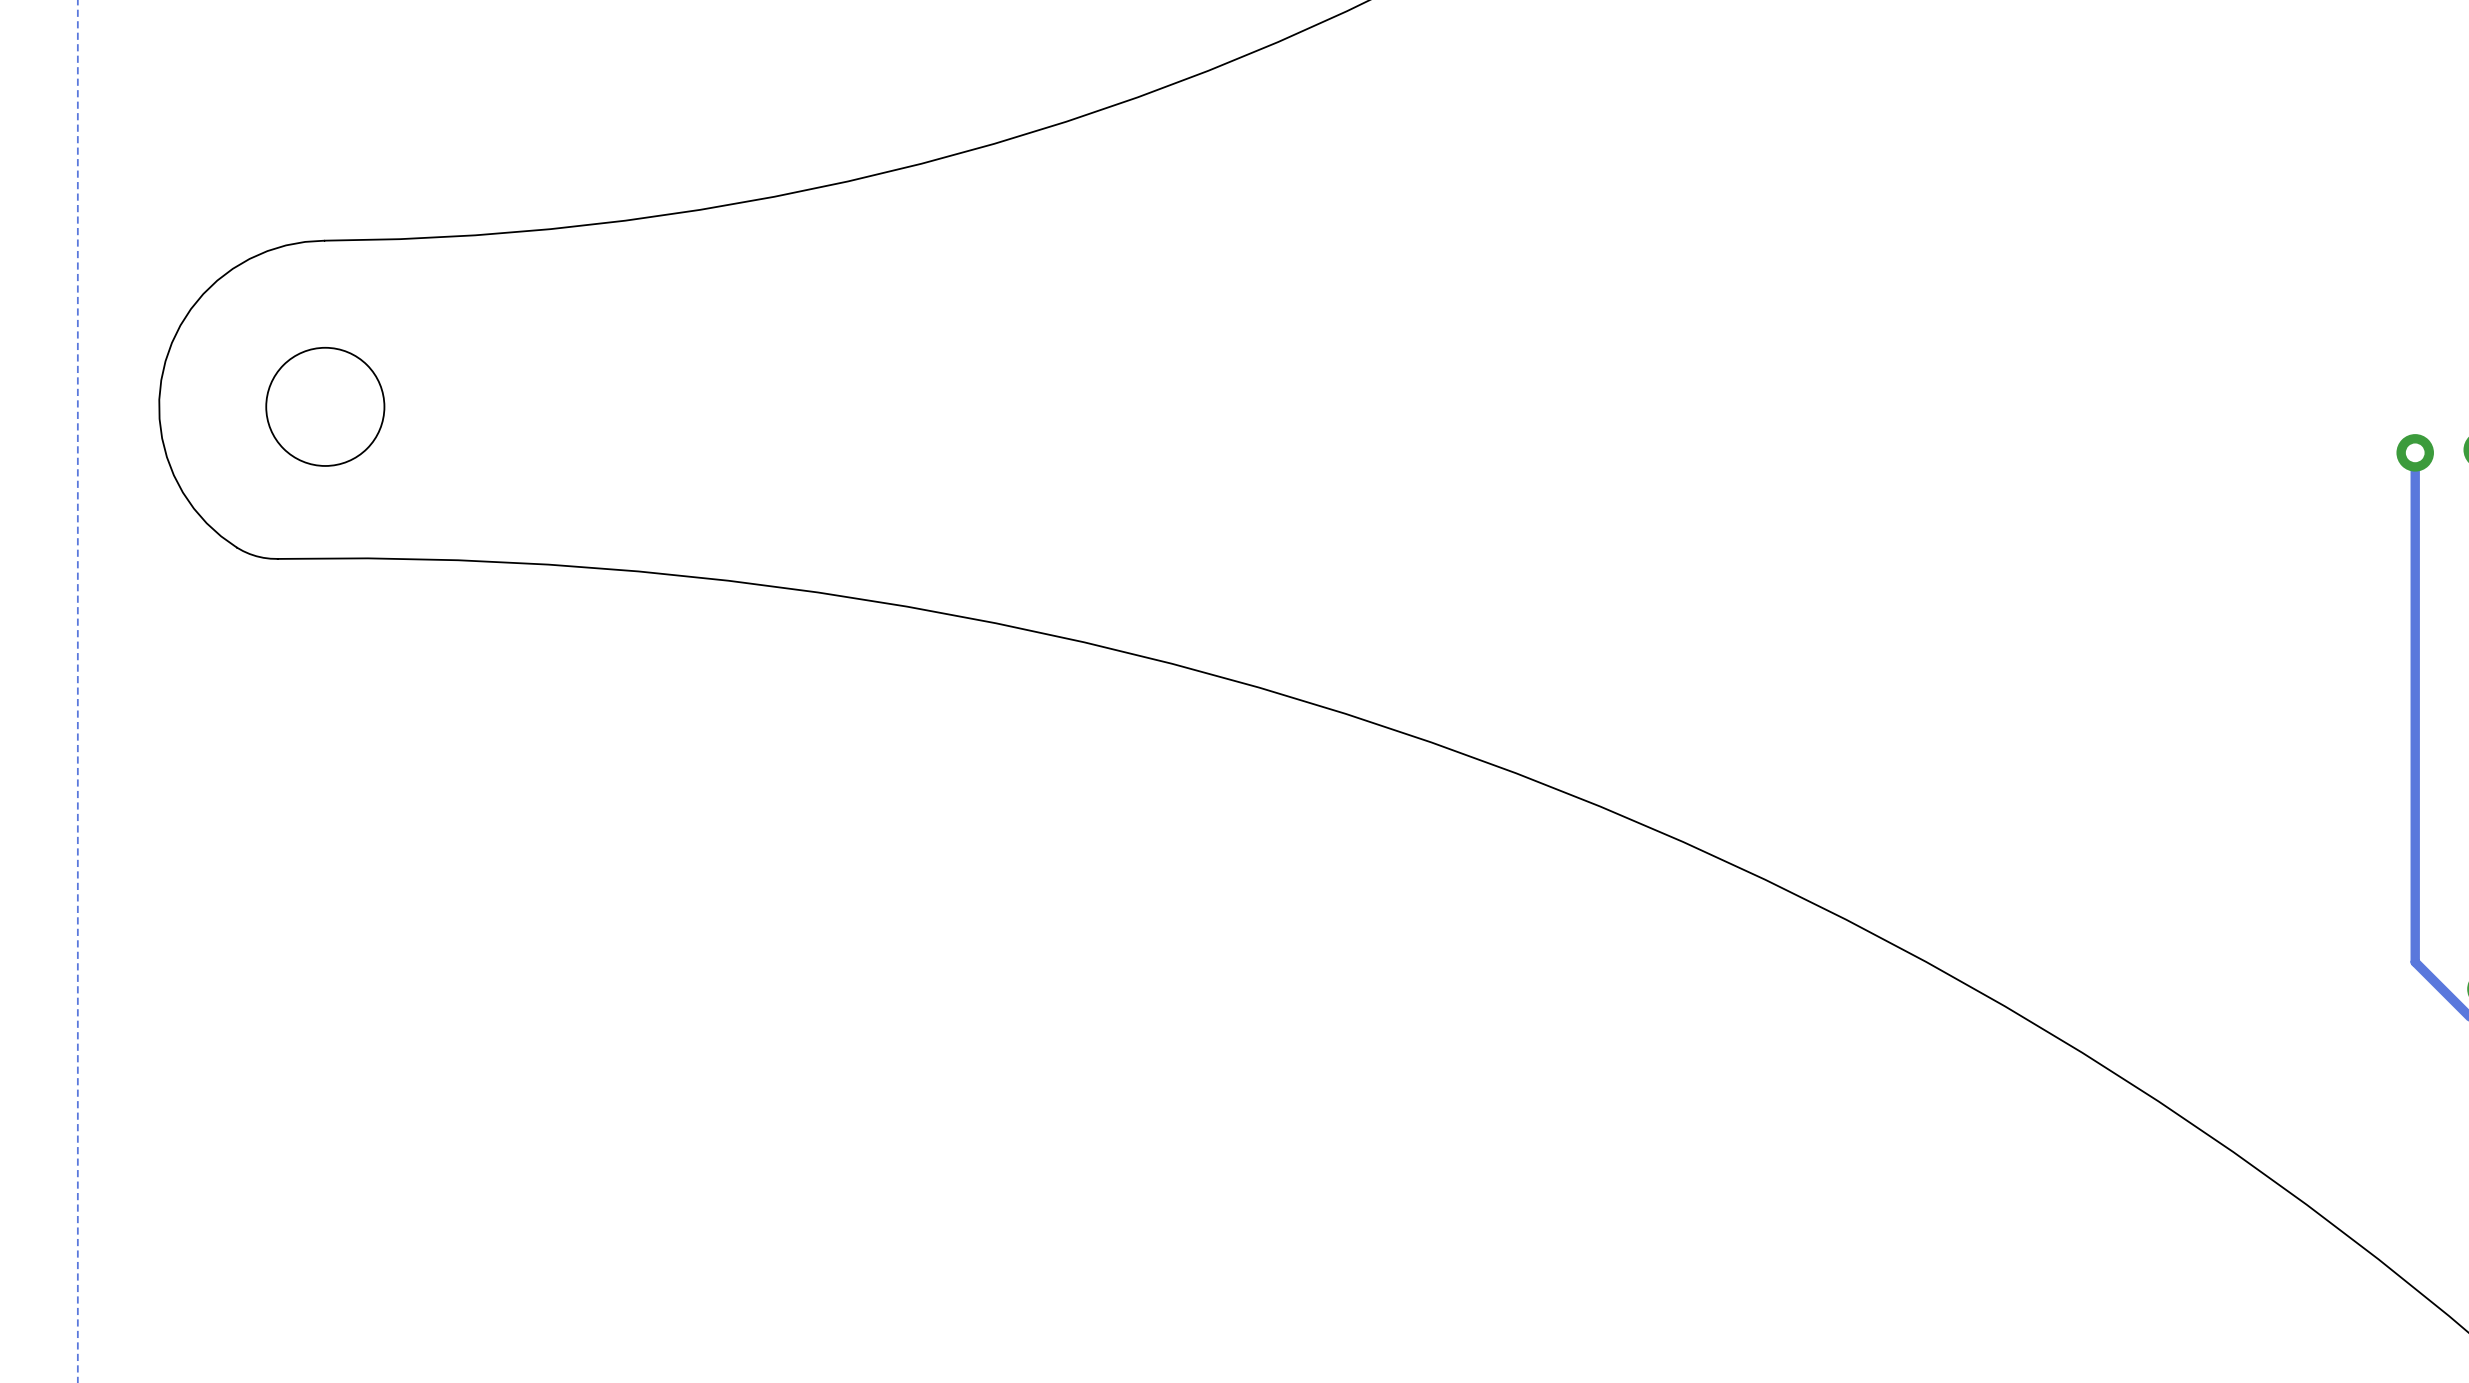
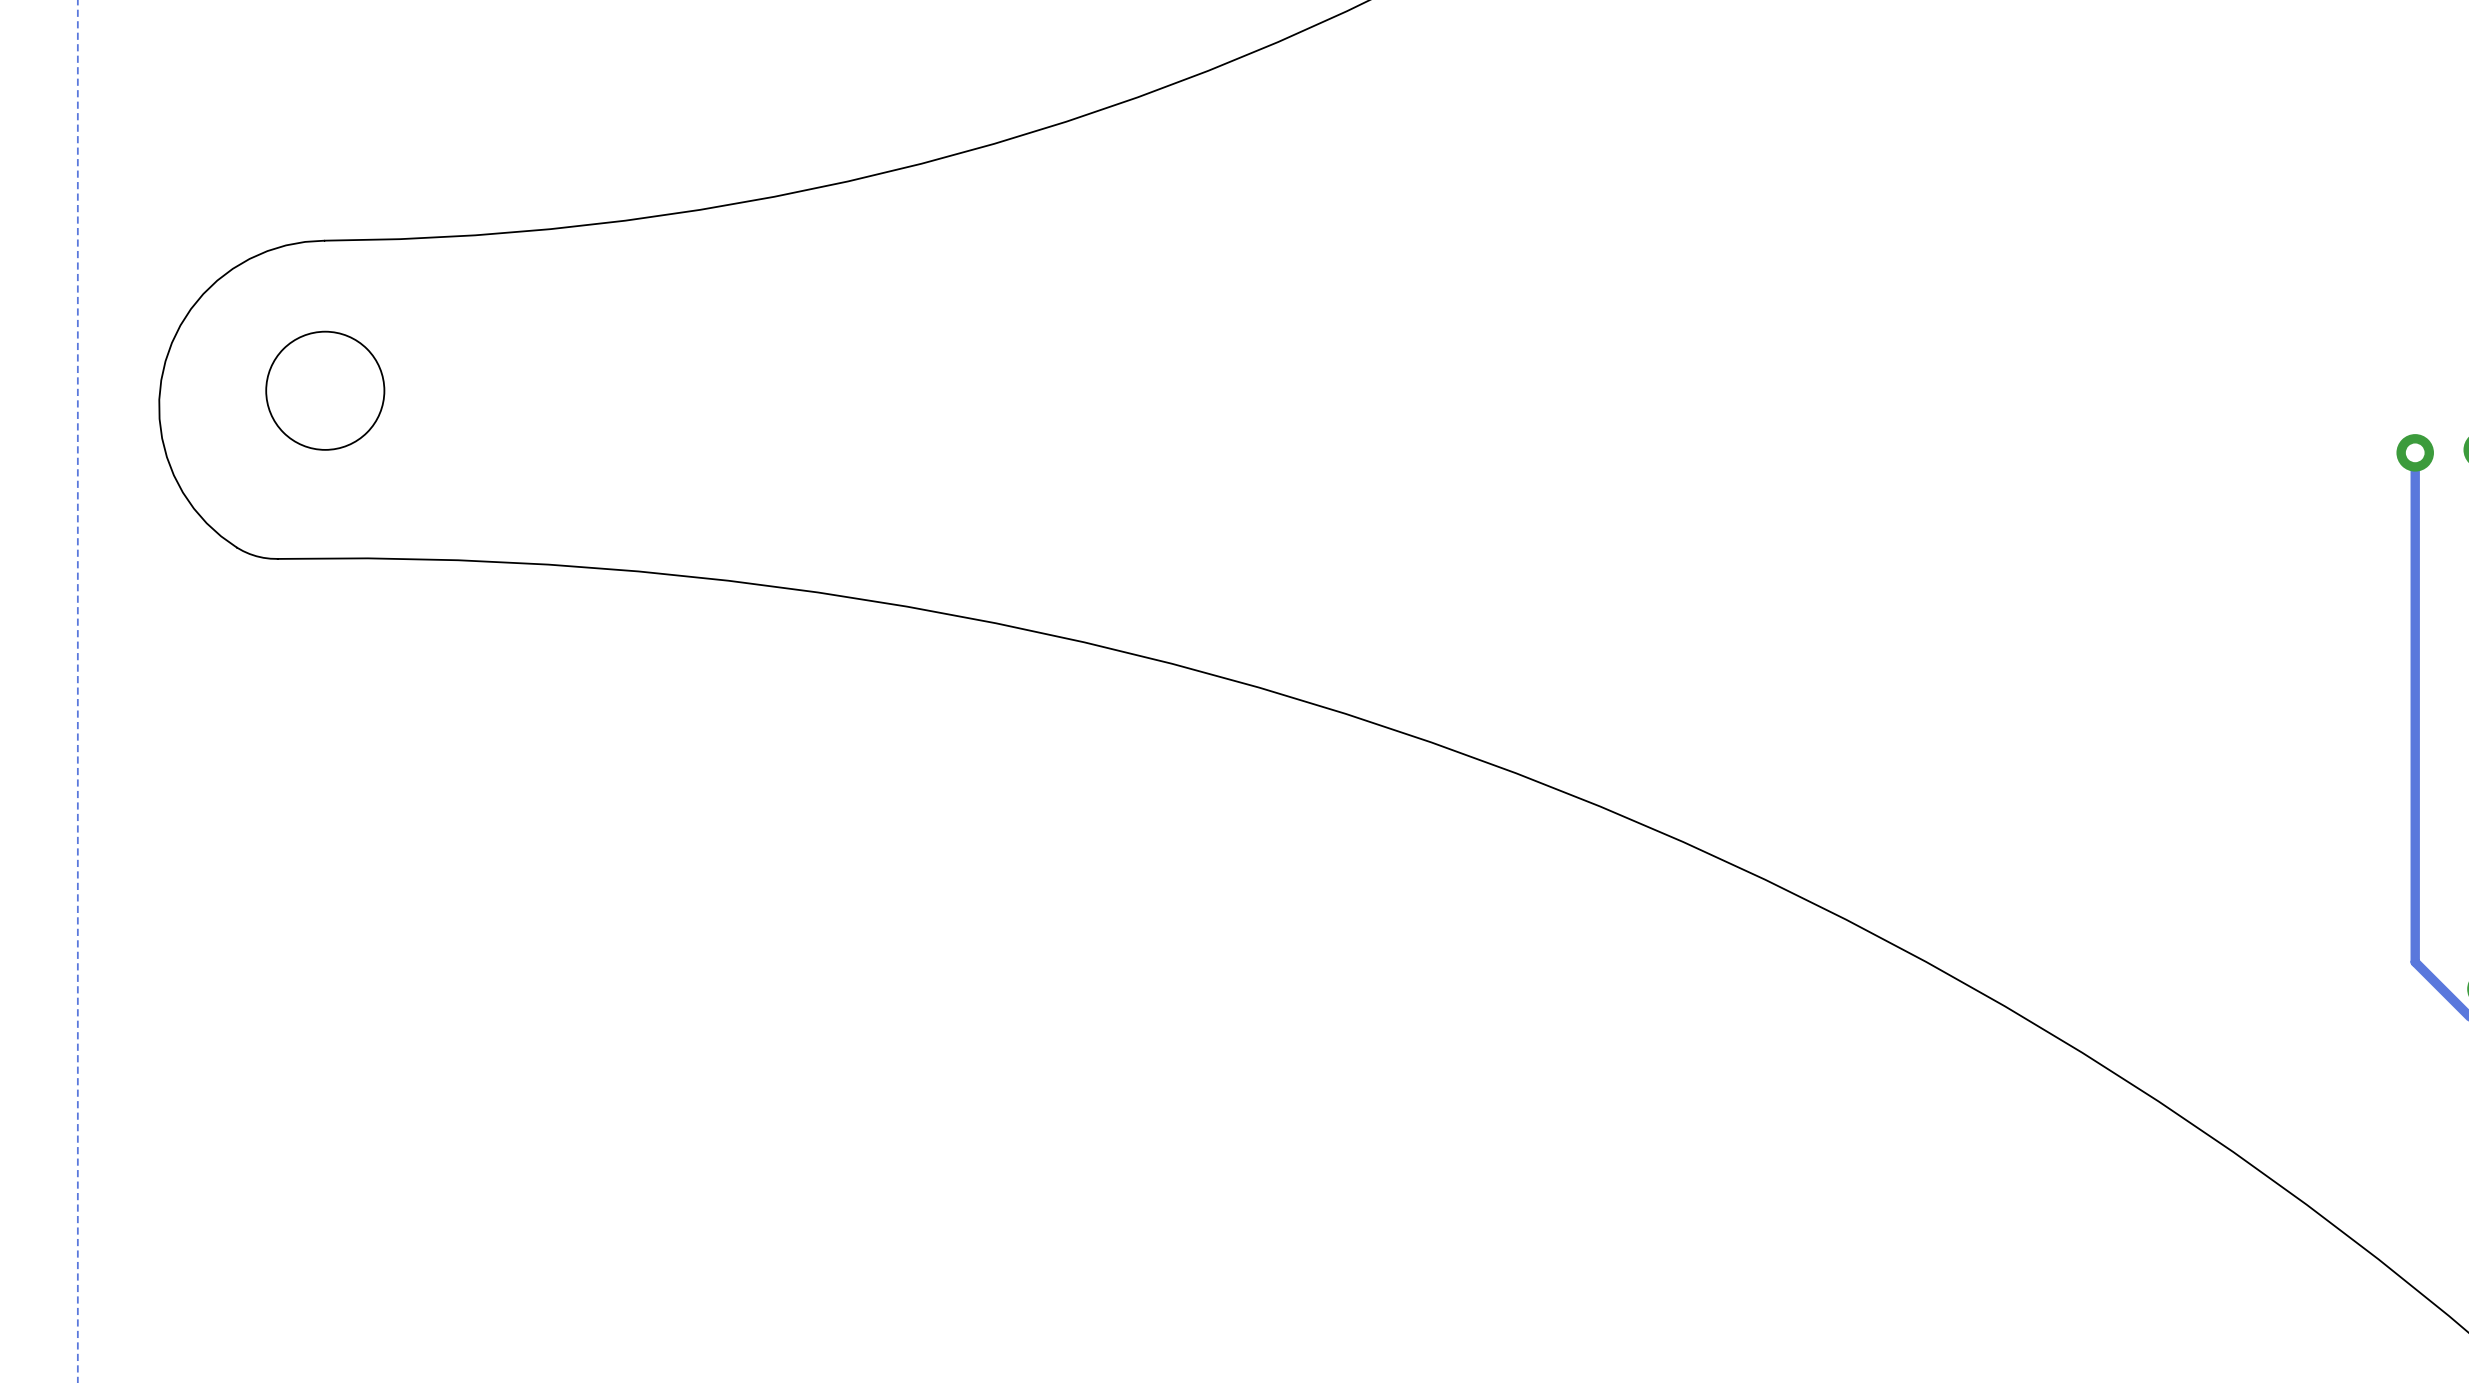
round board edge position: (325, 406) -> (325, 390)

